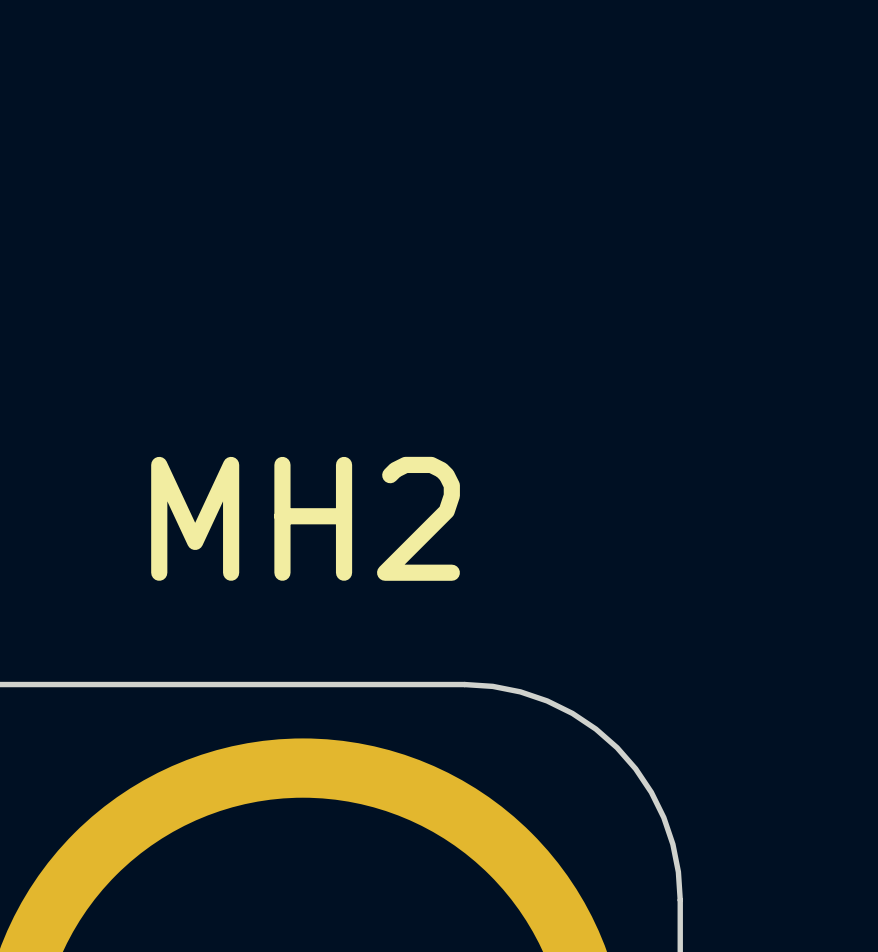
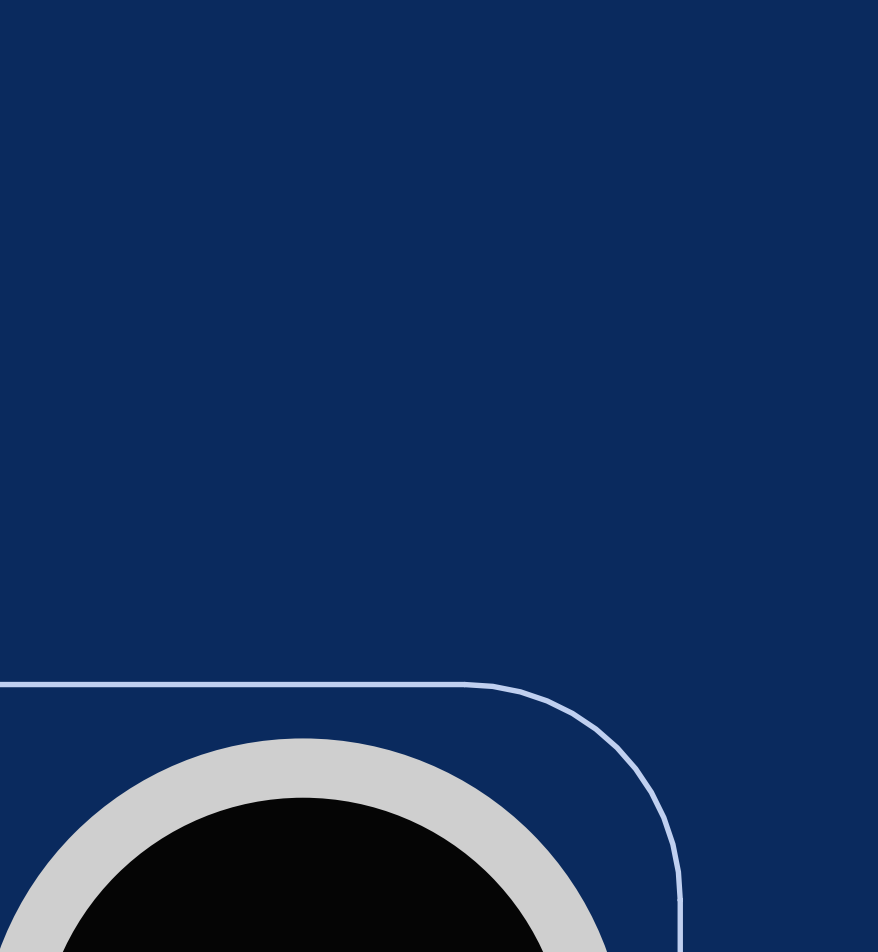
MH2 name: MH2 (305, 518) -> none

